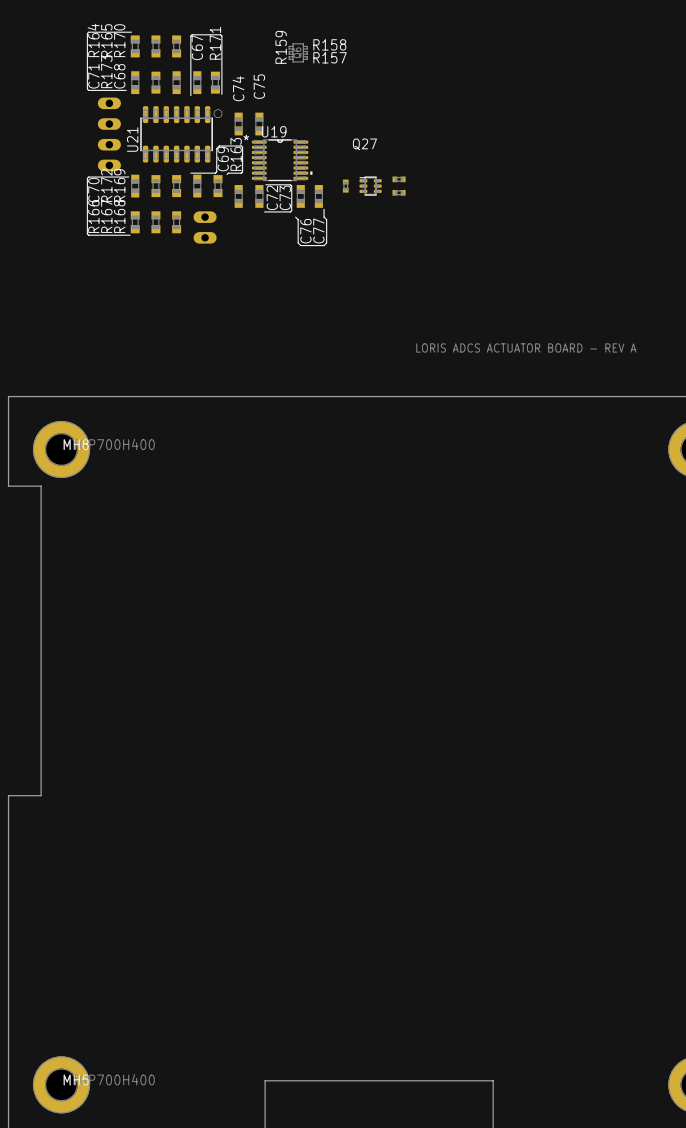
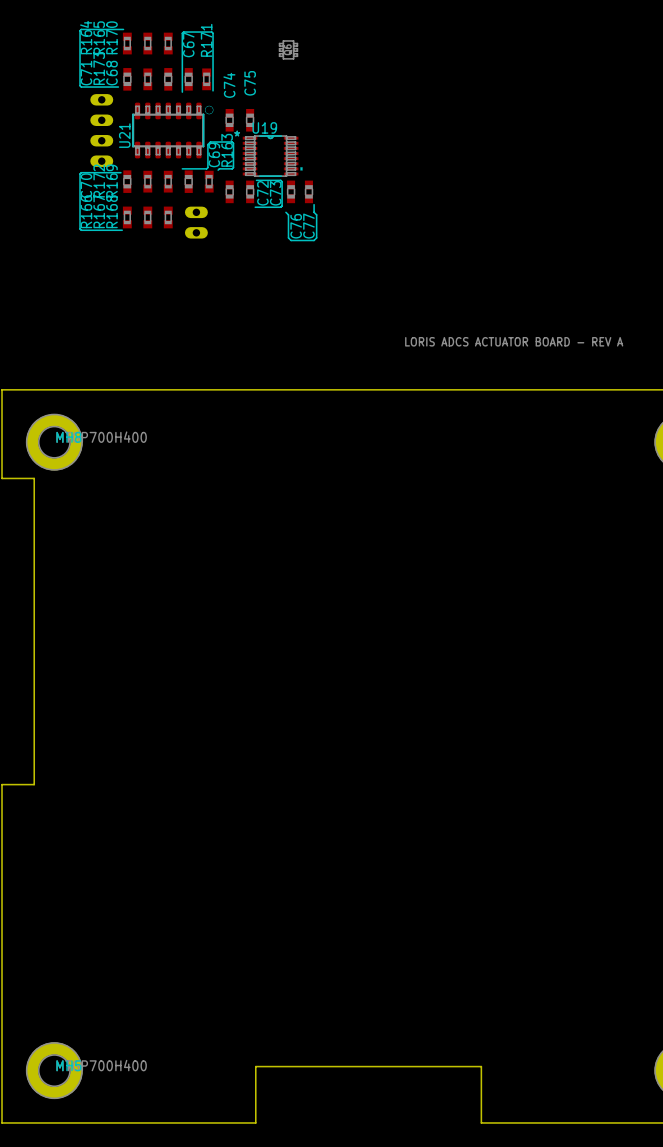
R158: (399, 179) -> none
R159: (345, 186) -> none
Q27: (370, 186) -> none
R157: (399, 192) -> none

